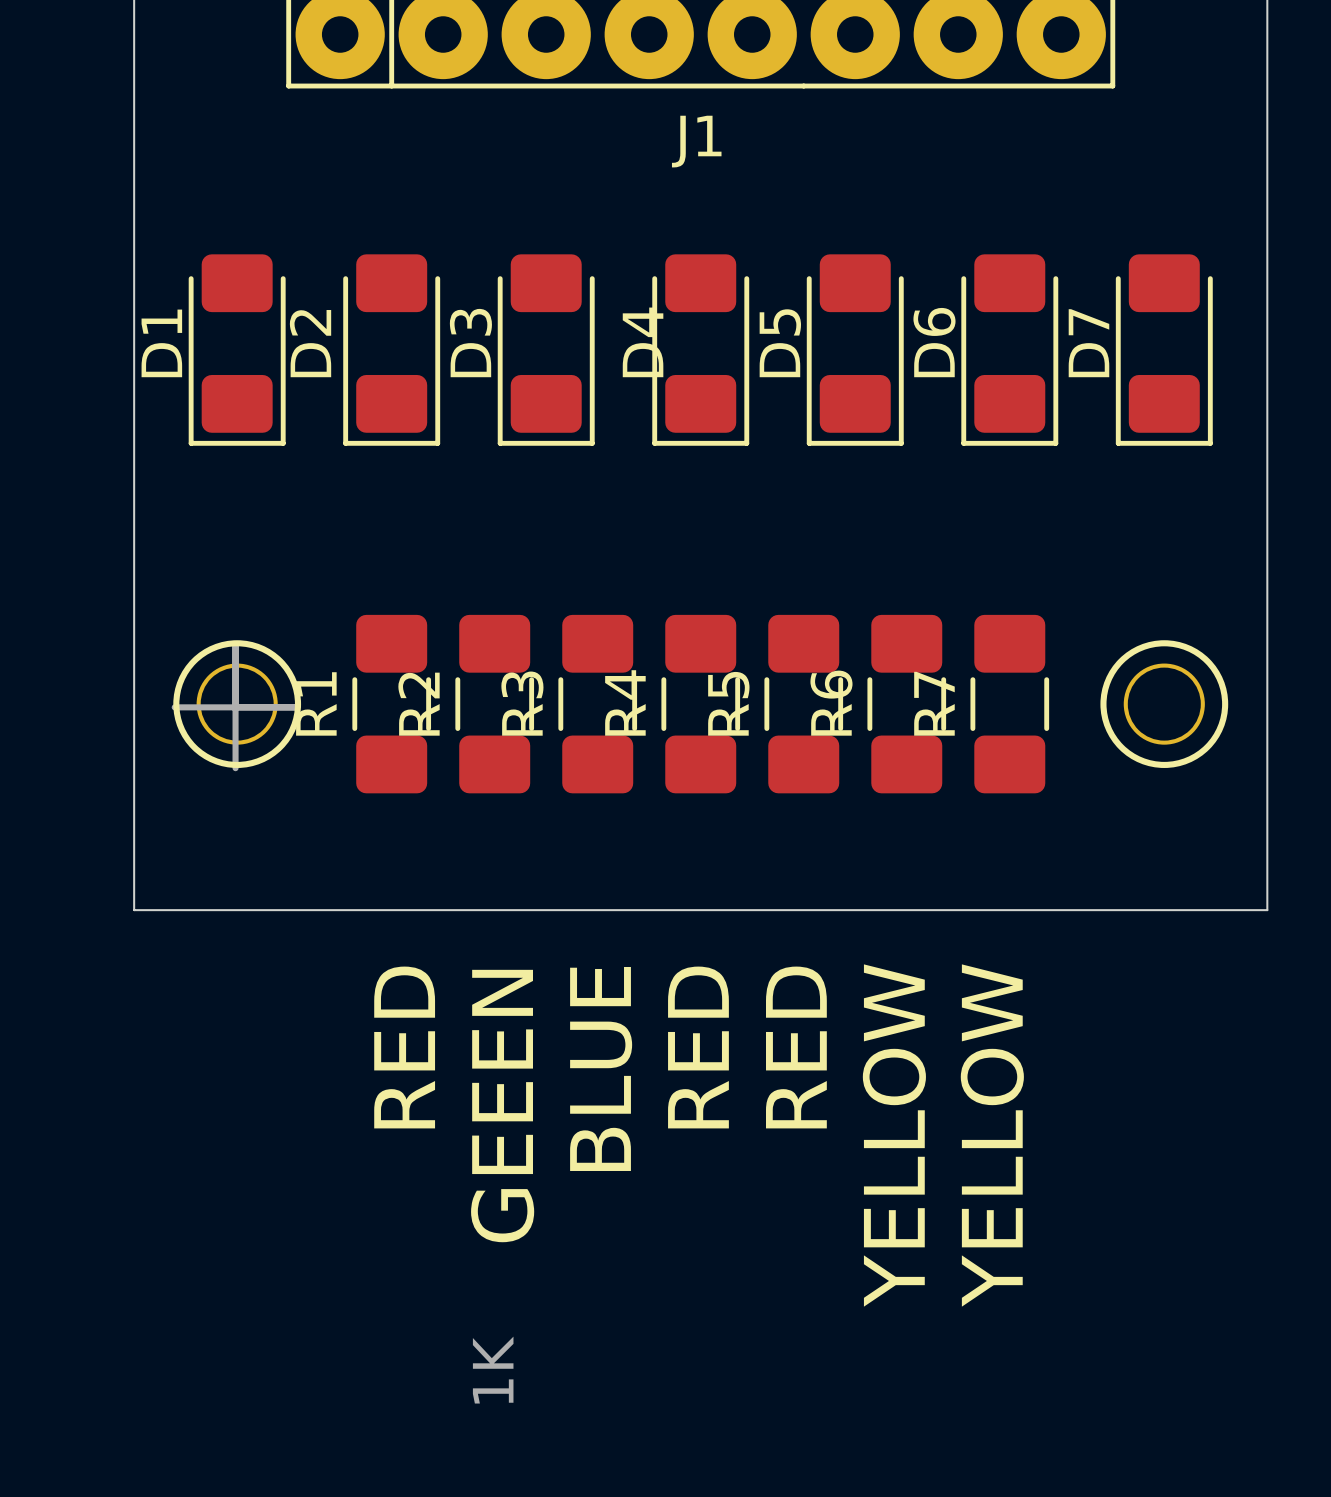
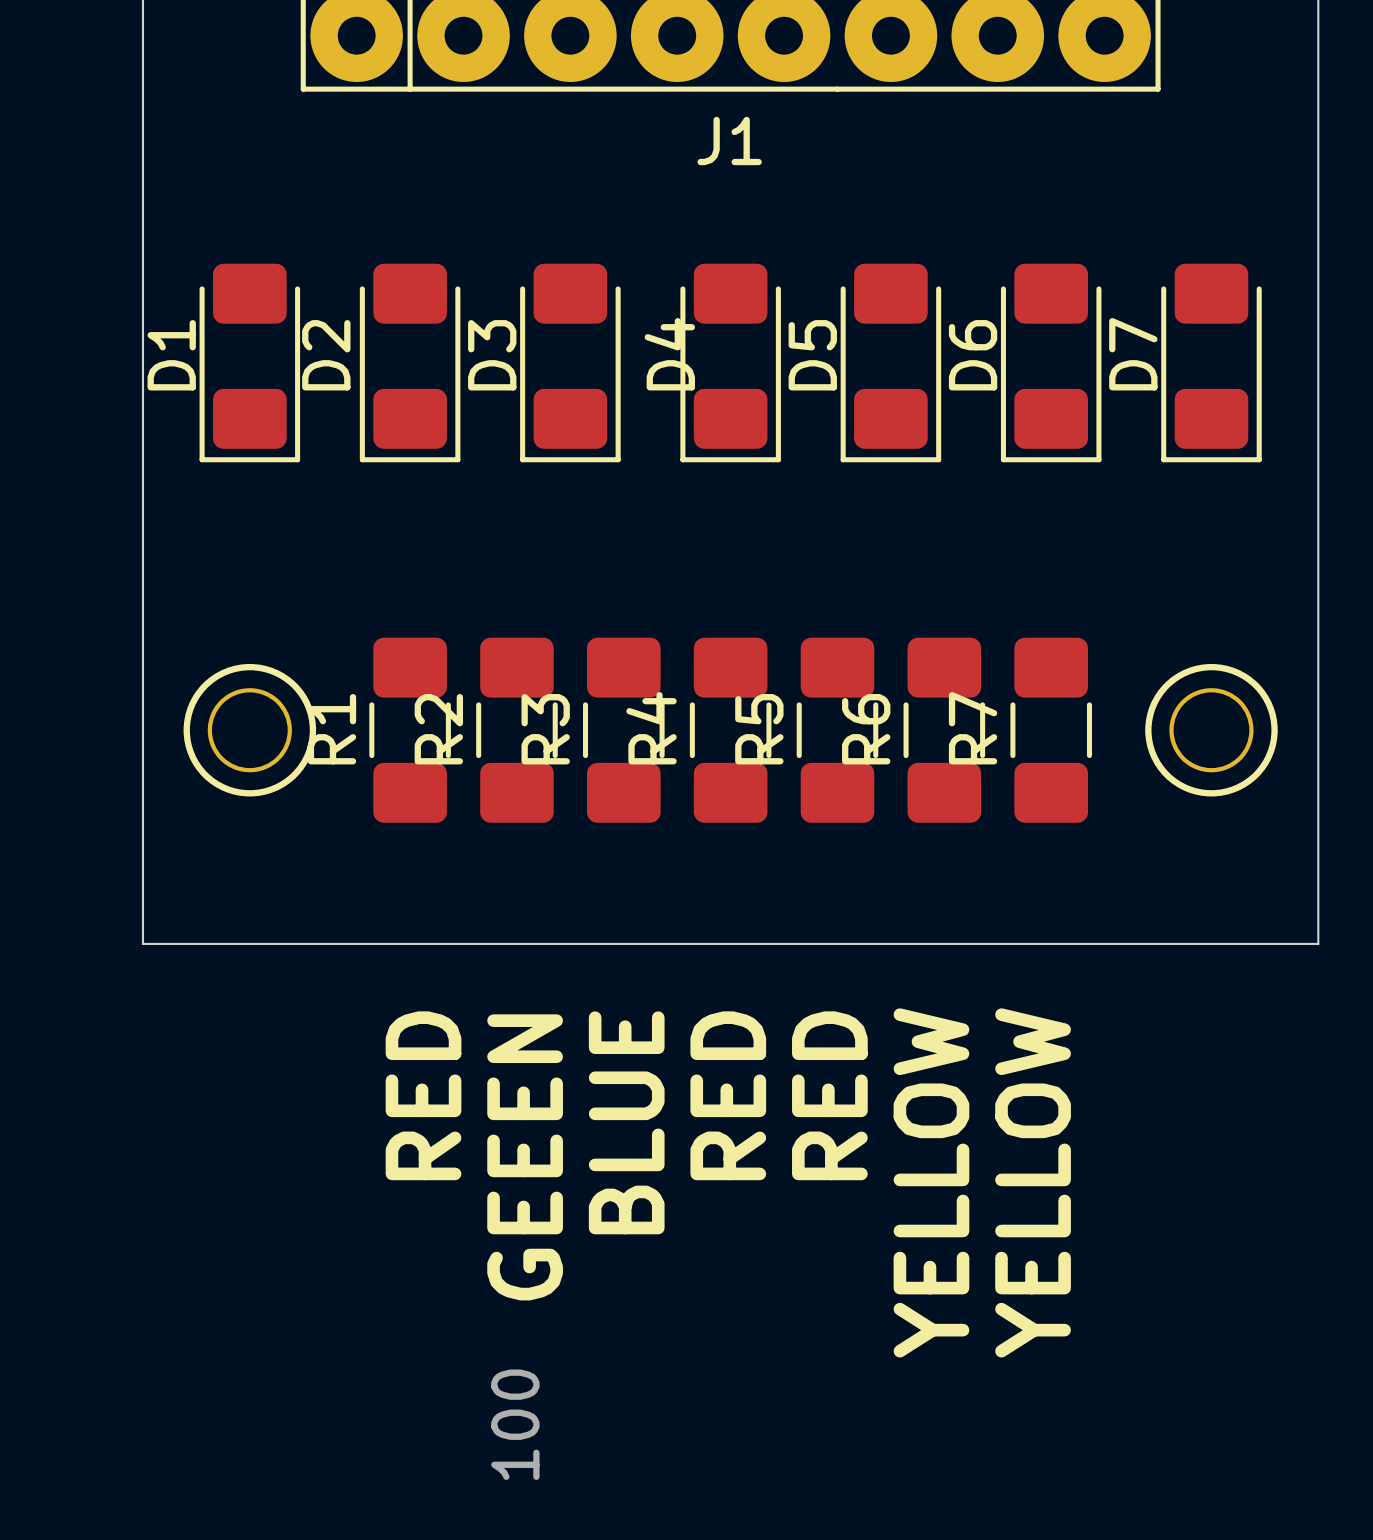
line: (235, 646) (235, 768) -> none
line: (174, 707) (296, 707) -> none
text: 1K (493, 1370) -> 100 (515, 1424)

